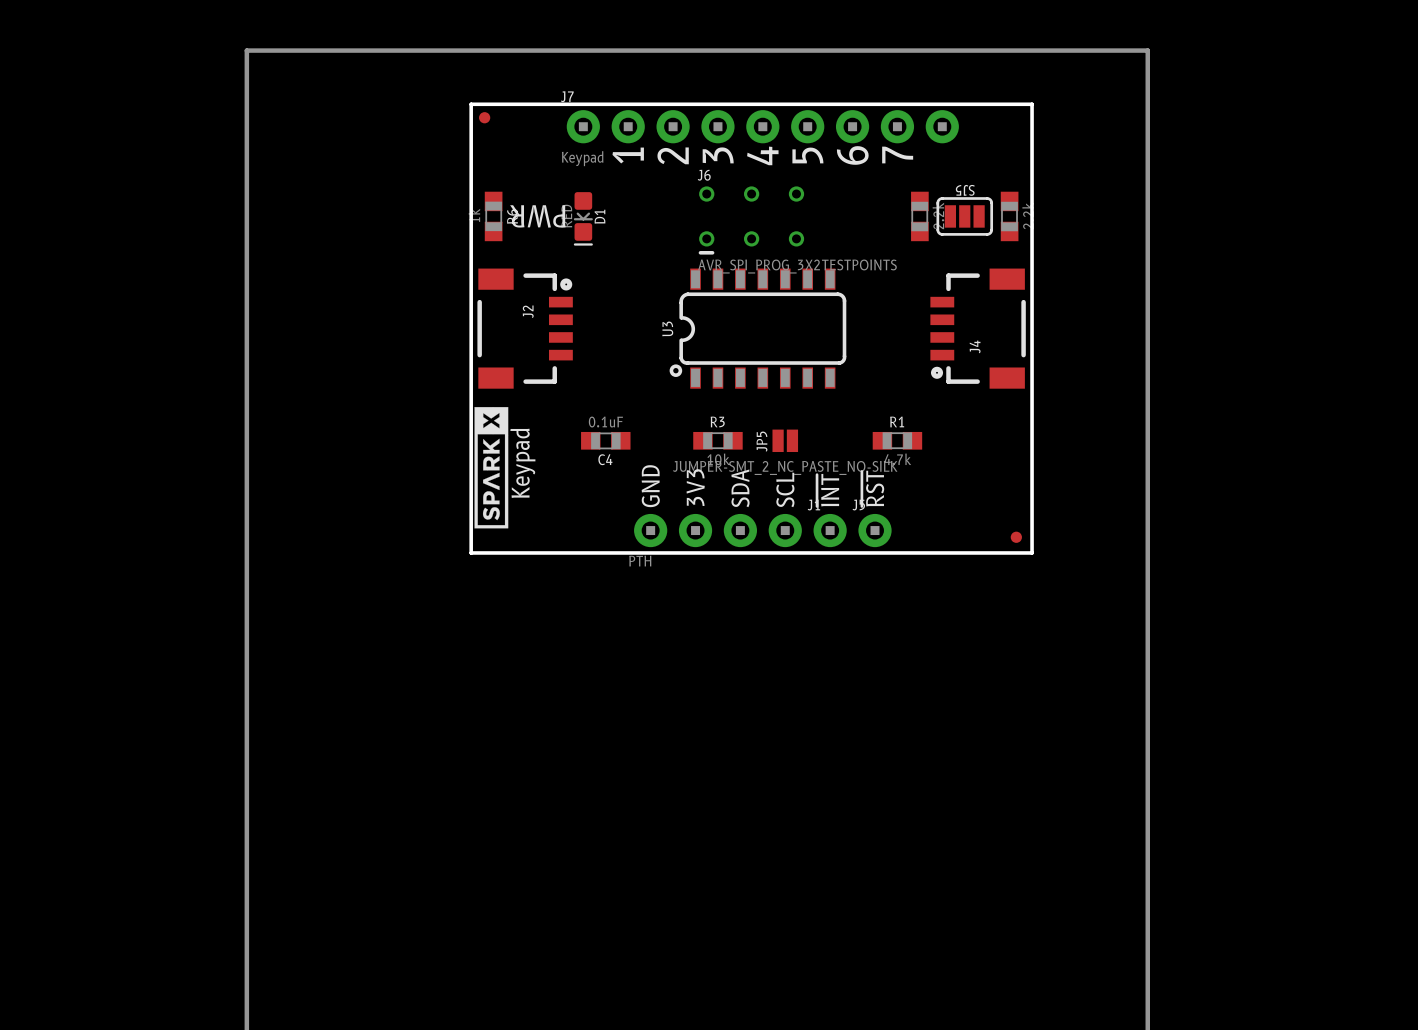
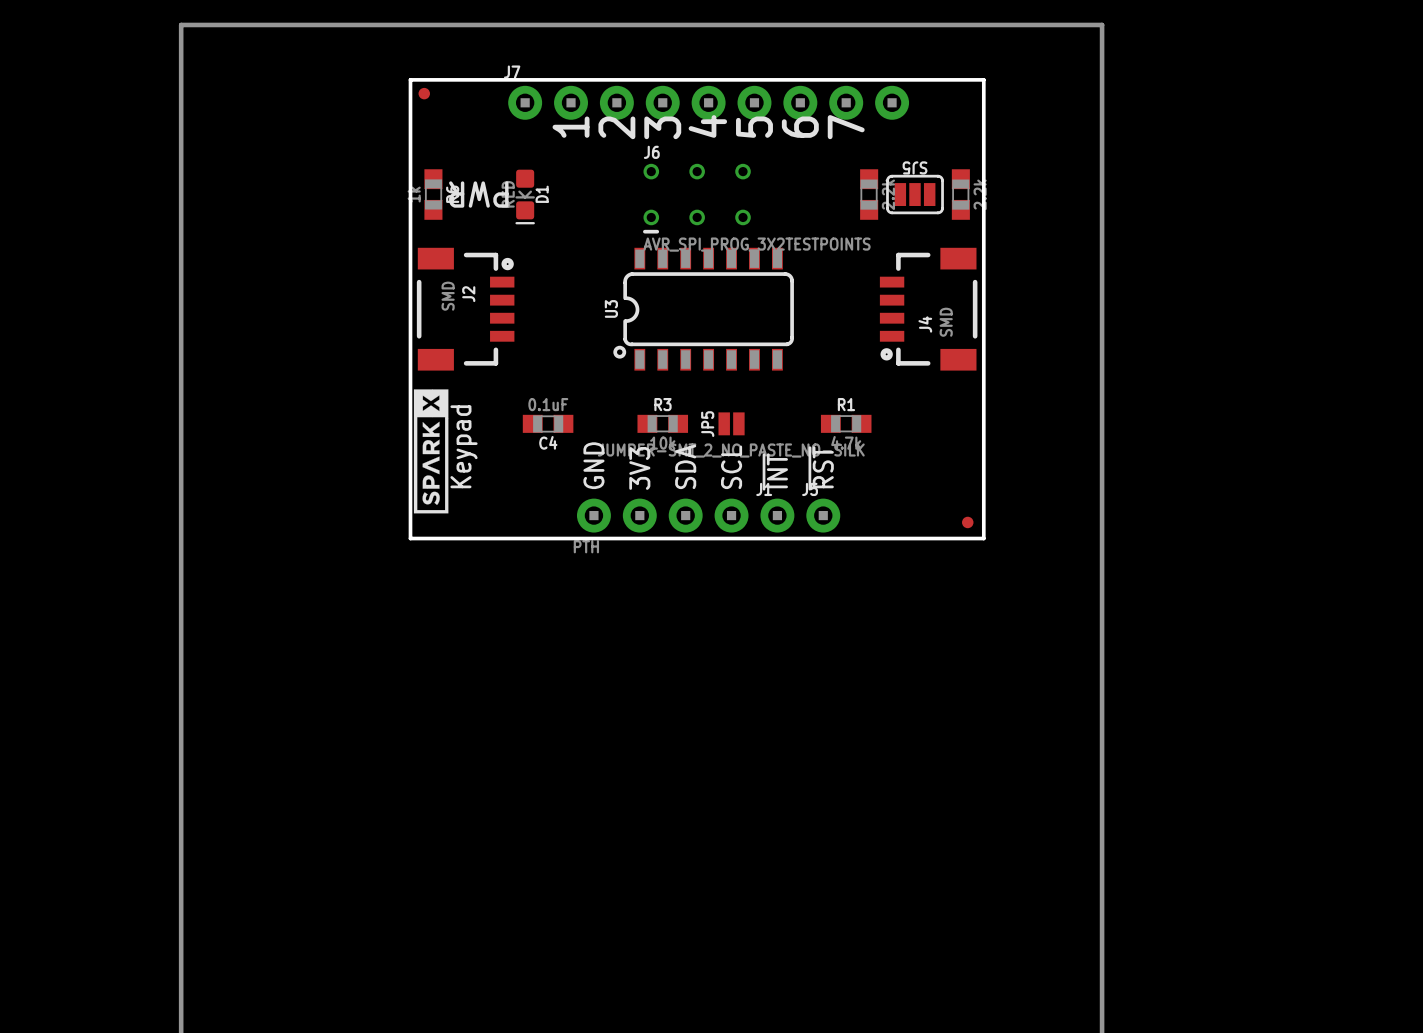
J7 value: Keypad (582, 158) -> none
J2 value: none -> SMD (448, 296)
J4 value: none -> SMD (946, 322)

